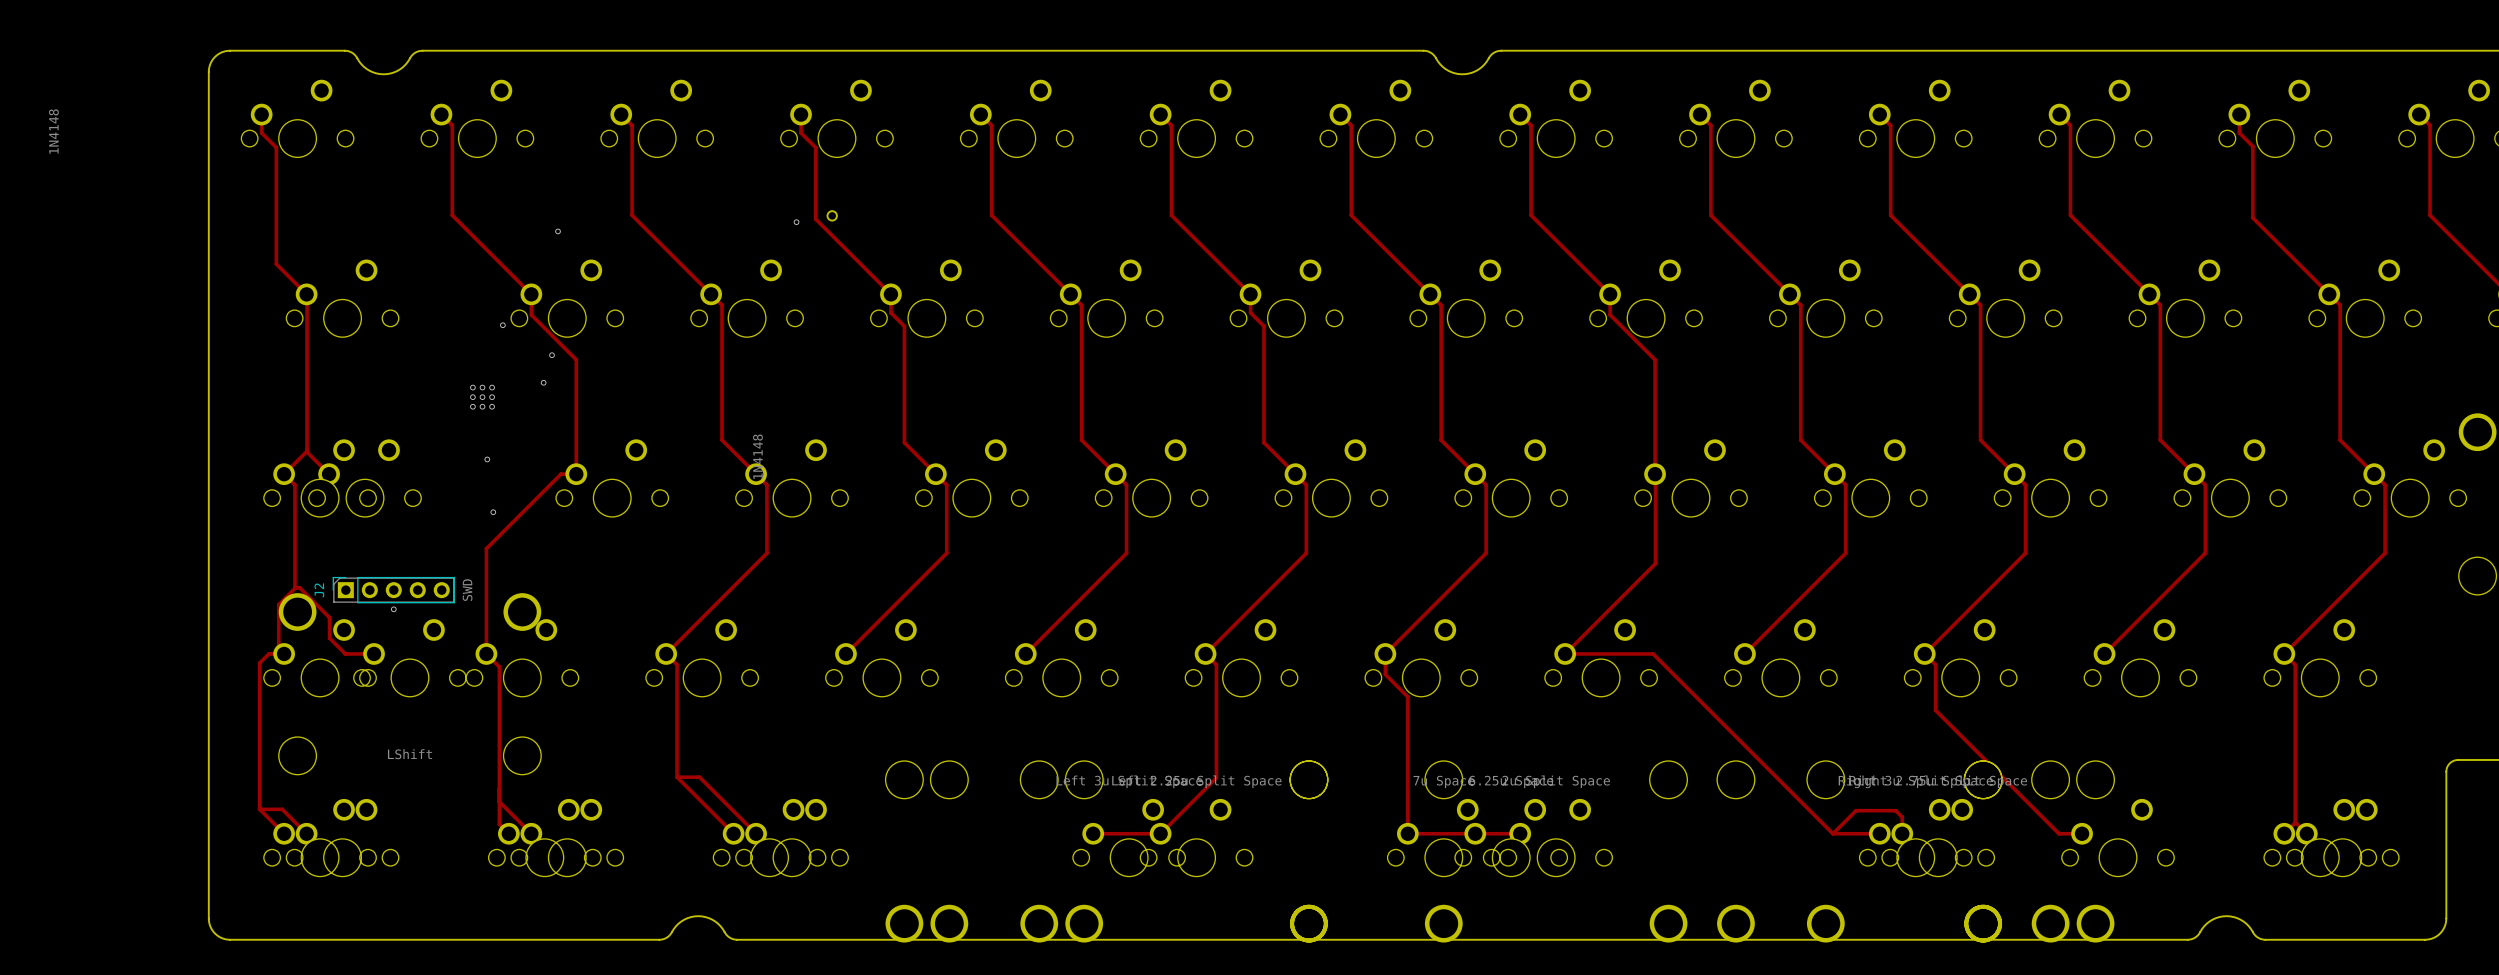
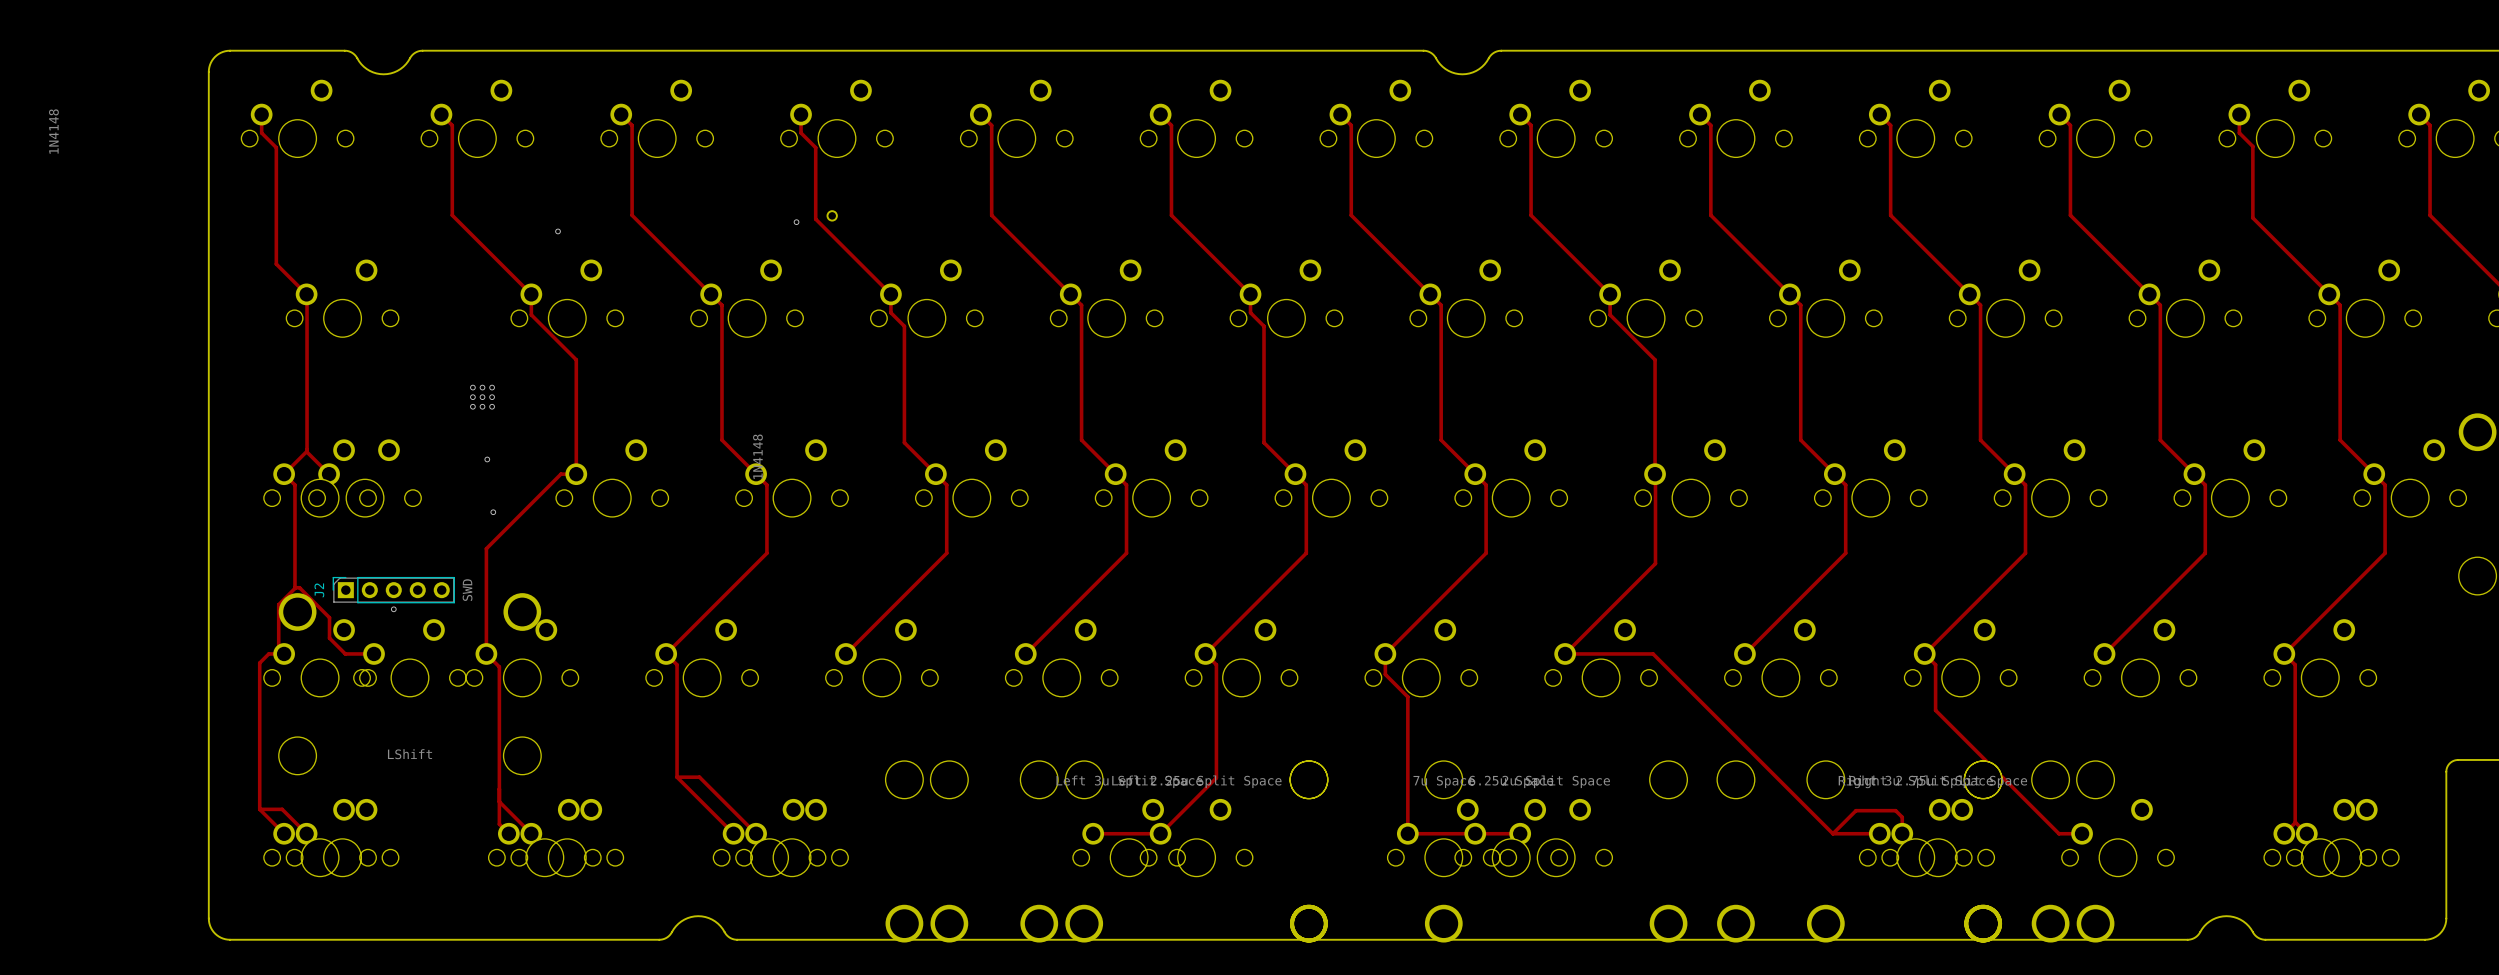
via: (502, 325) -> none
via: (552, 355) -> none
via: (543, 382) -> none

